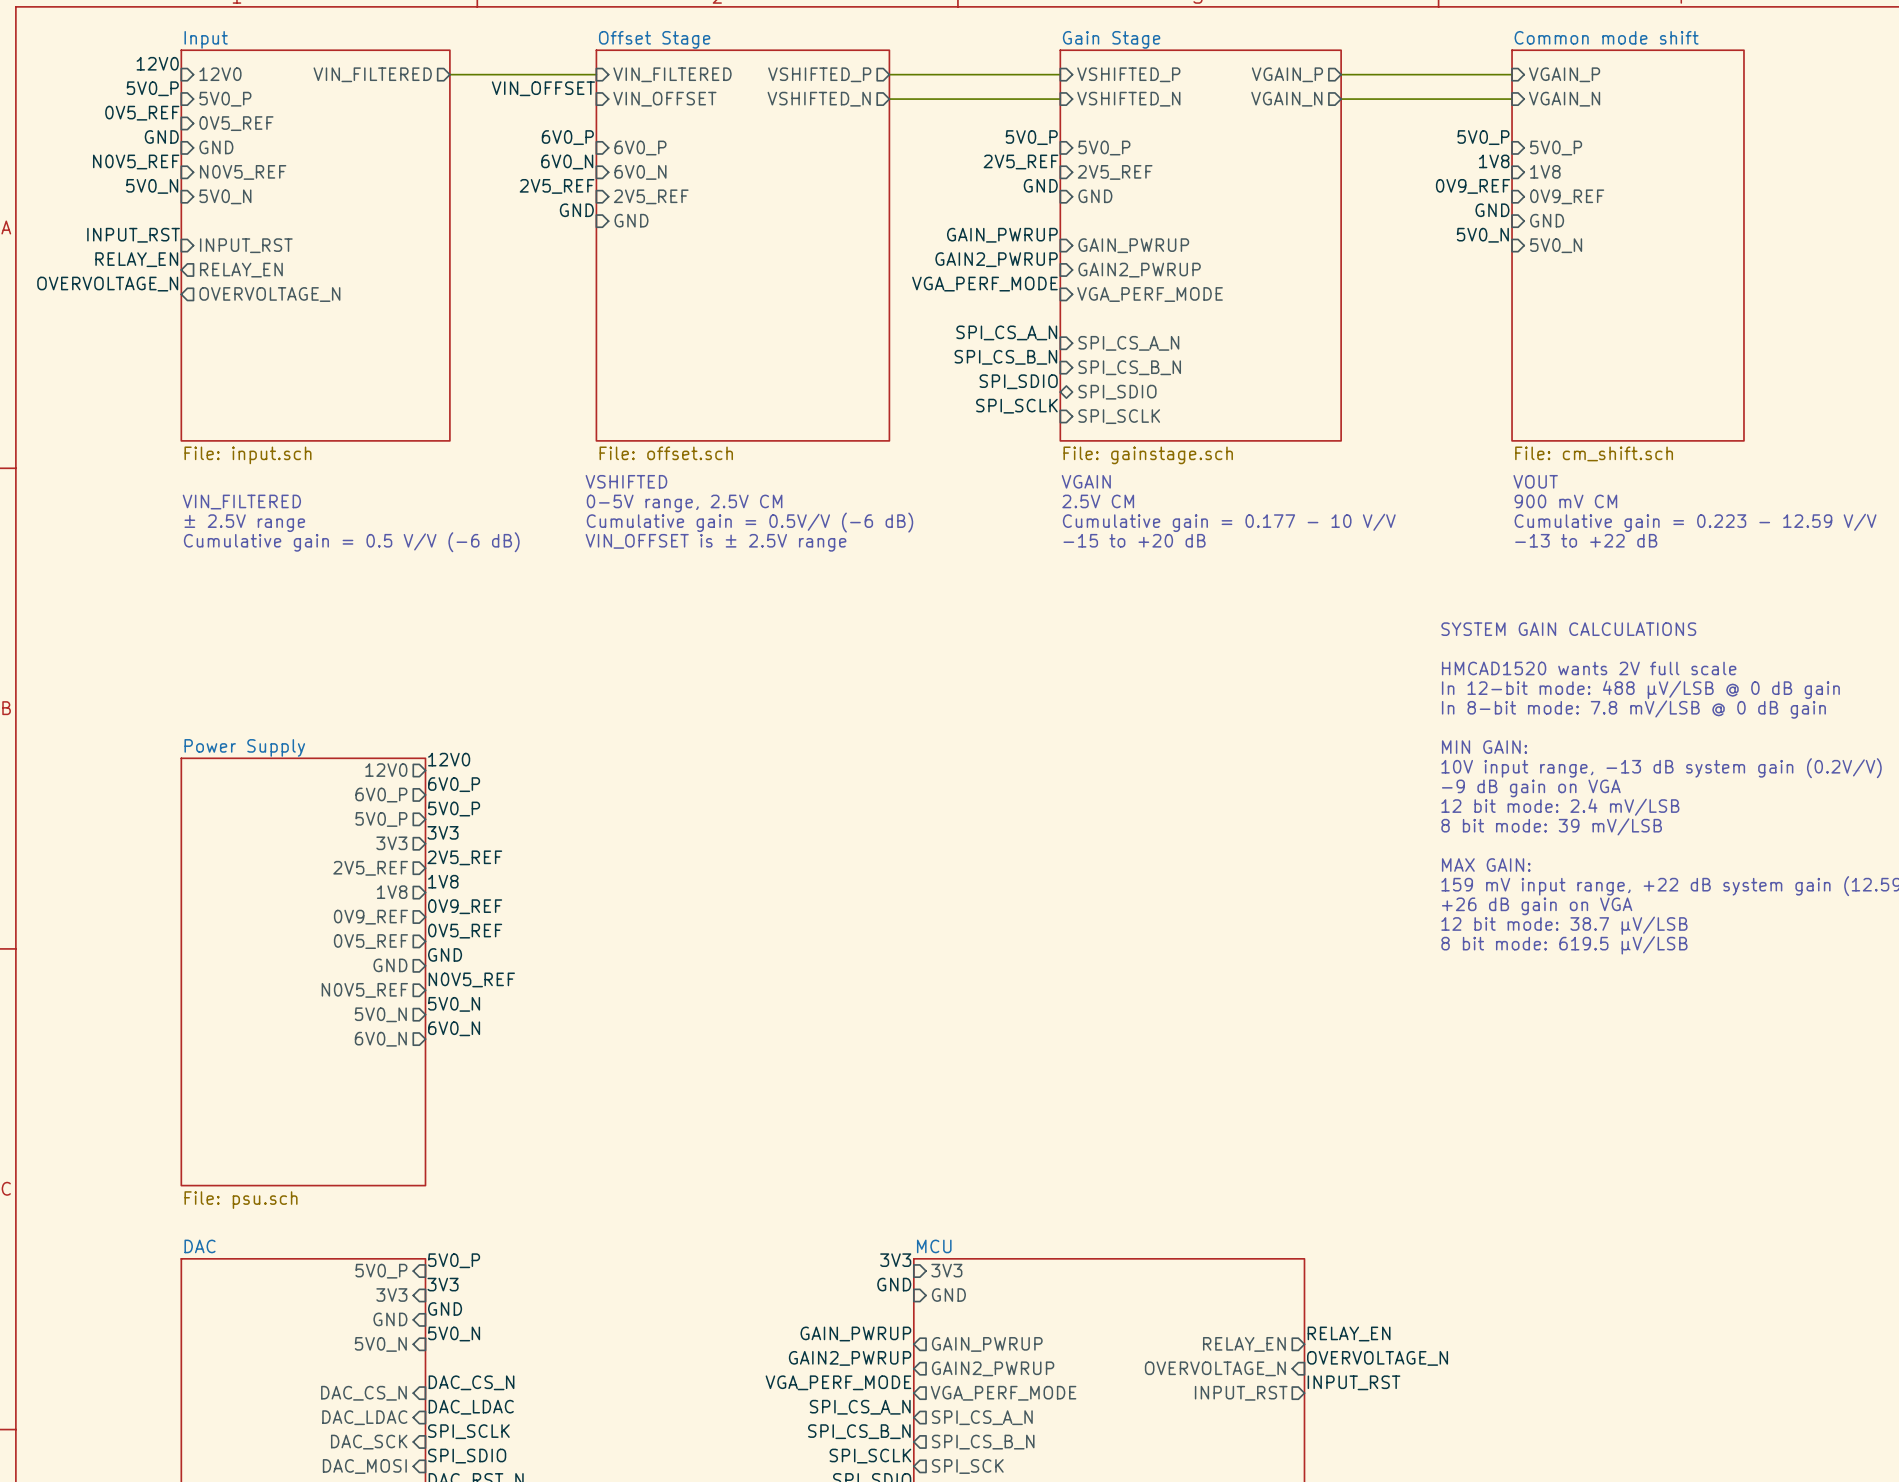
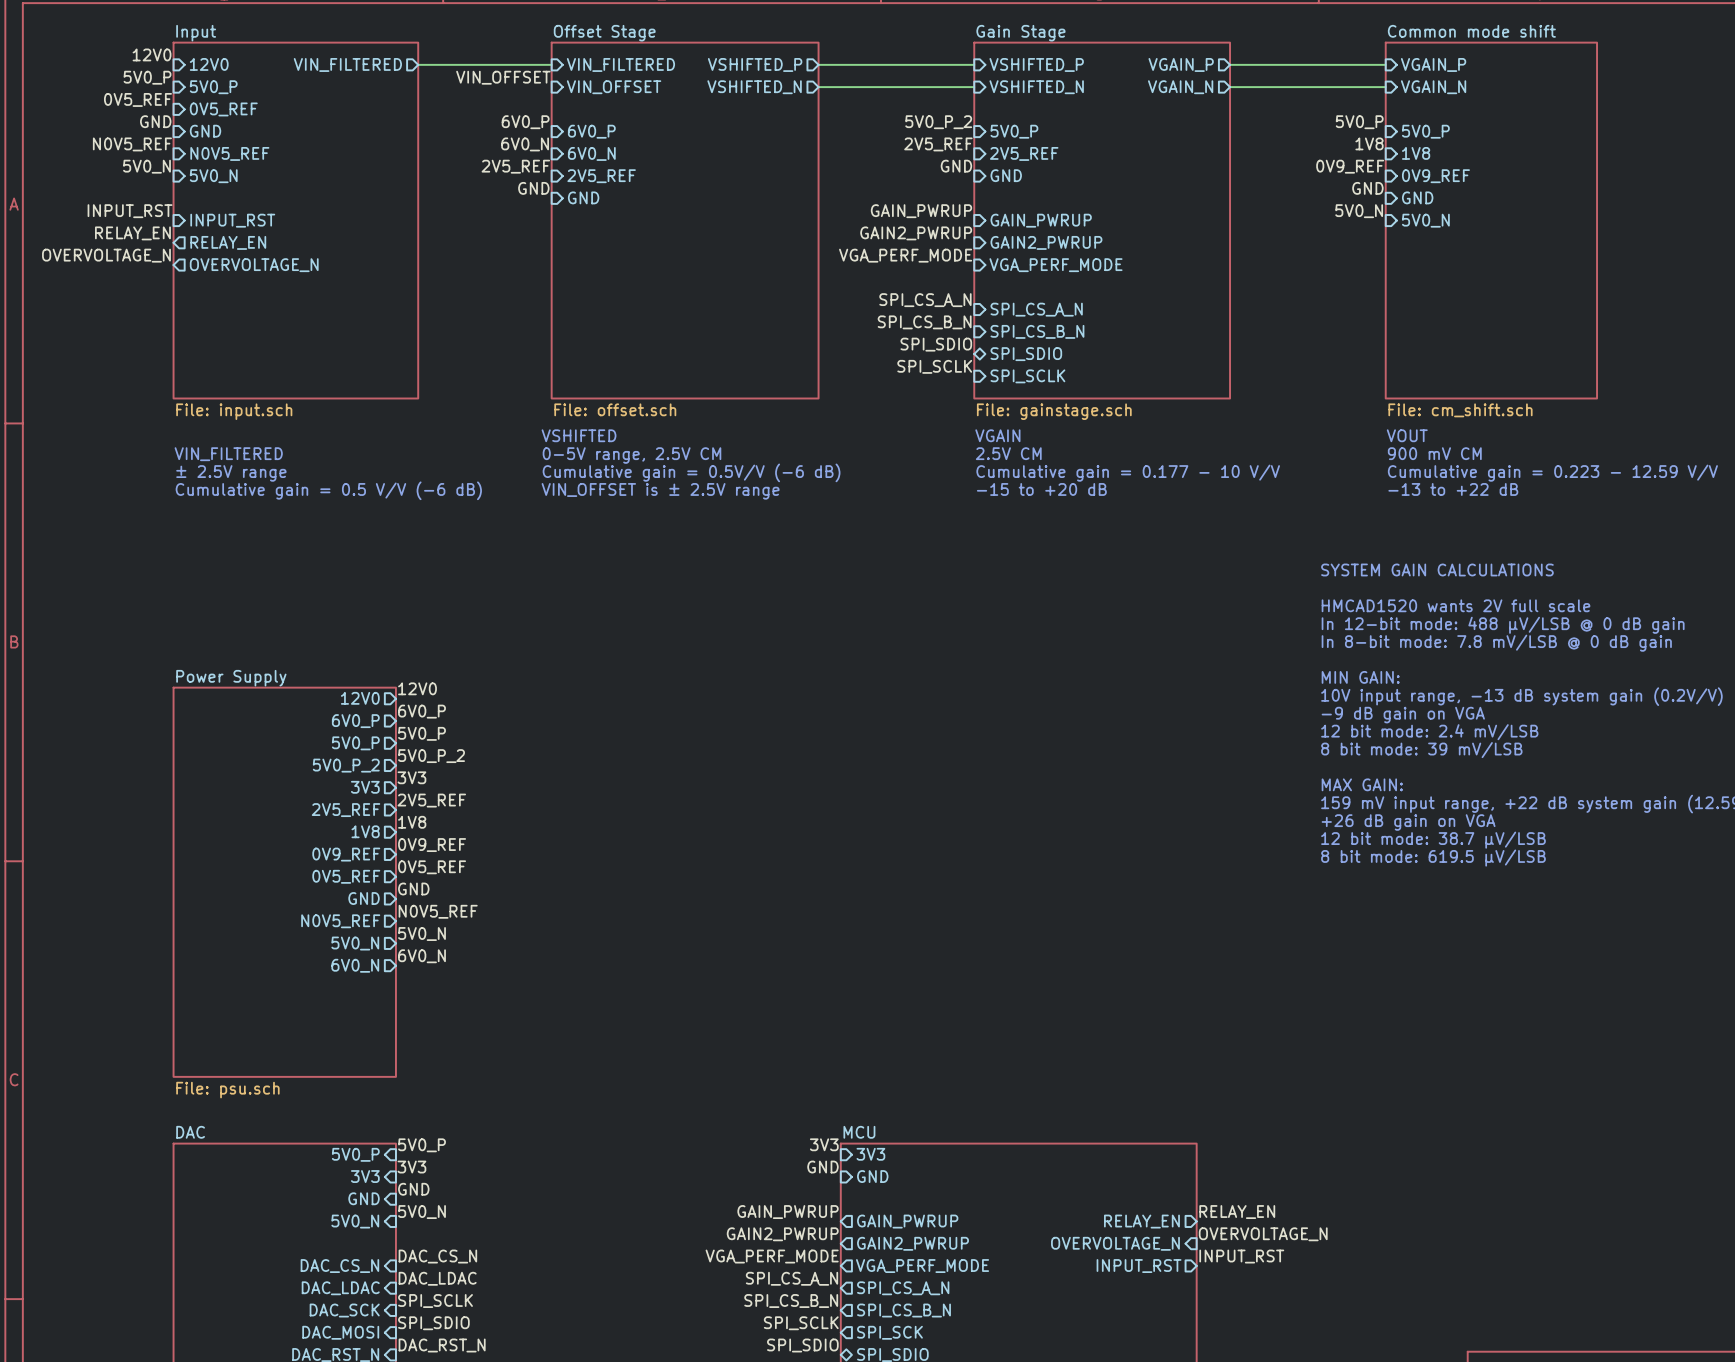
label: 5V0_P (1031, 137) -> 5V0_P_2 (938, 122)
label: 3V3 (443, 832) -> 5V0_P_2 (431, 756)
sheet pin: 3V3 (391, 843) -> 5V0_P_2 (346, 765)
label: 2V5_REF (464, 857) -> 3V3 (411, 777)
sheet pin: 2V5_REF (370, 868) -> 3V3 (365, 787)
label: 1V8 (443, 881) -> 2V5_REF (431, 800)
sheet pin: 1V8 (392, 892) -> 2V5_REF (346, 810)
label: 0V9_REF (465, 906) -> 1V8 (412, 822)
sheet pin: 0V9_REF (370, 917) -> 1V8 (365, 831)
label: 0V5_REF (465, 931) -> 0V9_REF (432, 845)
sheet pin: 0V5_REF (370, 941) -> 0V9_REF (346, 854)
label: GND (445, 954) -> 0V5_REF (432, 867)
sheet pin: GND (390, 965) -> 0V5_REF (346, 876)
label: N0V5_REF (471, 979) -> GND (413, 889)
sheet pin: N0V5_REF (364, 990) -> GND (364, 898)
label: 5V0_N (454, 1004) -> N0V5_REF (438, 911)
sheet pin: 5V0_N (380, 1014) -> N0V5_REF (340, 921)
label: 6V0_N (454, 1028) -> 5V0_N (422, 934)
sheet pin: 6V0_N (380, 1039) -> 5V0_N (355, 943)
label: none -> 6V0_N (422, 956)
sheet pin: none -> 6V0_N (355, 965)

